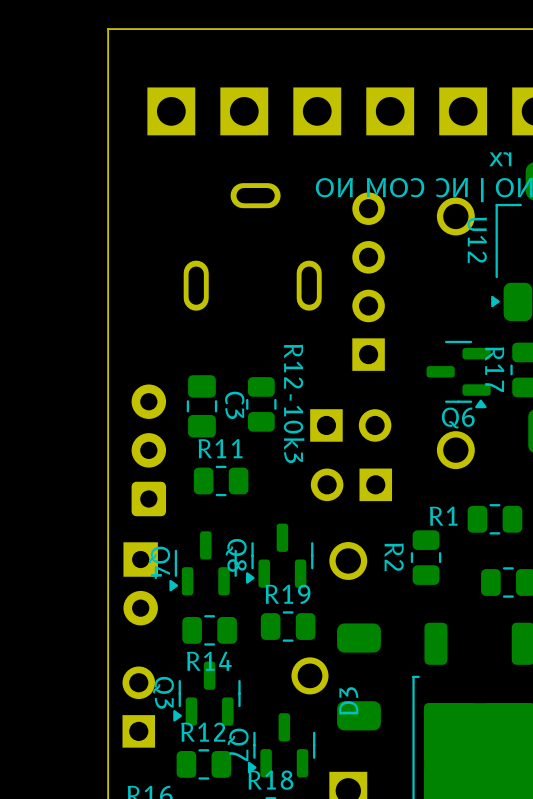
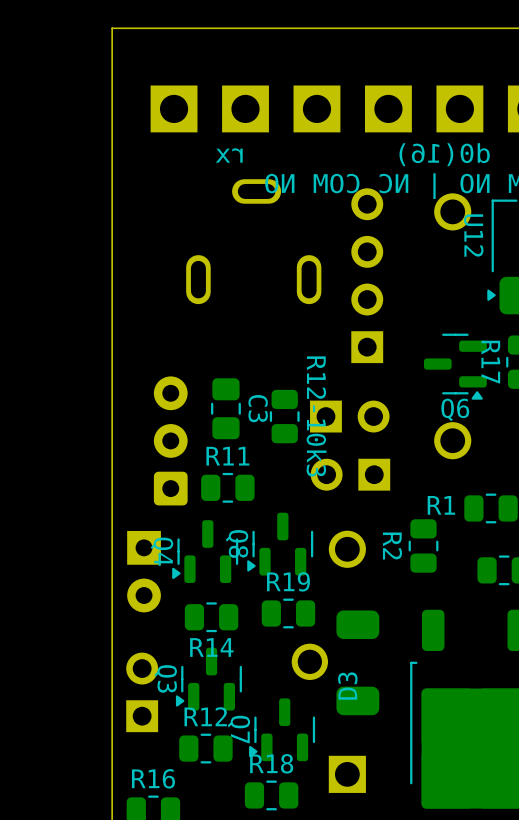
R12-10k3 position: (261, 404) -> (284, 416)
C3 position: (201, 406) -> (225, 408)
part position: (148, 450) -> (170, 440)
R11 position: (221, 480) -> (227, 487)

